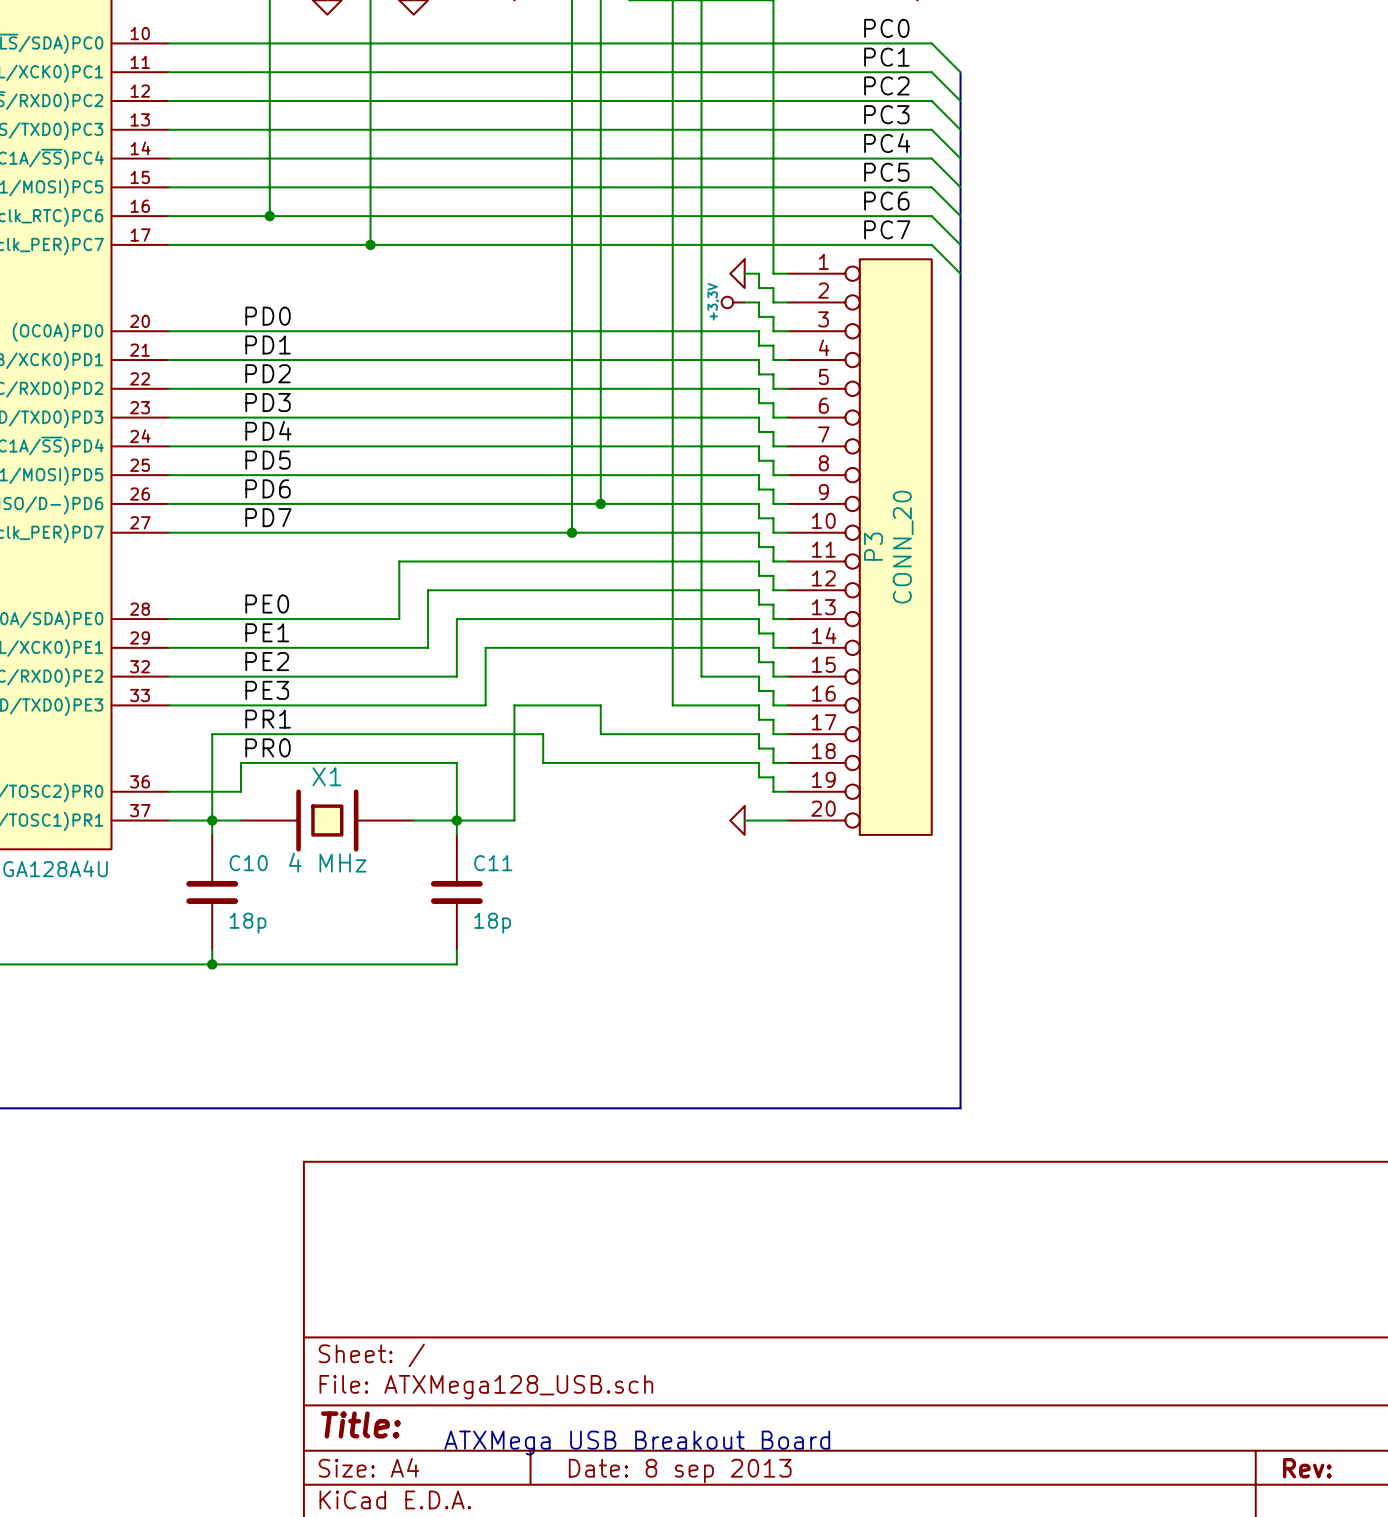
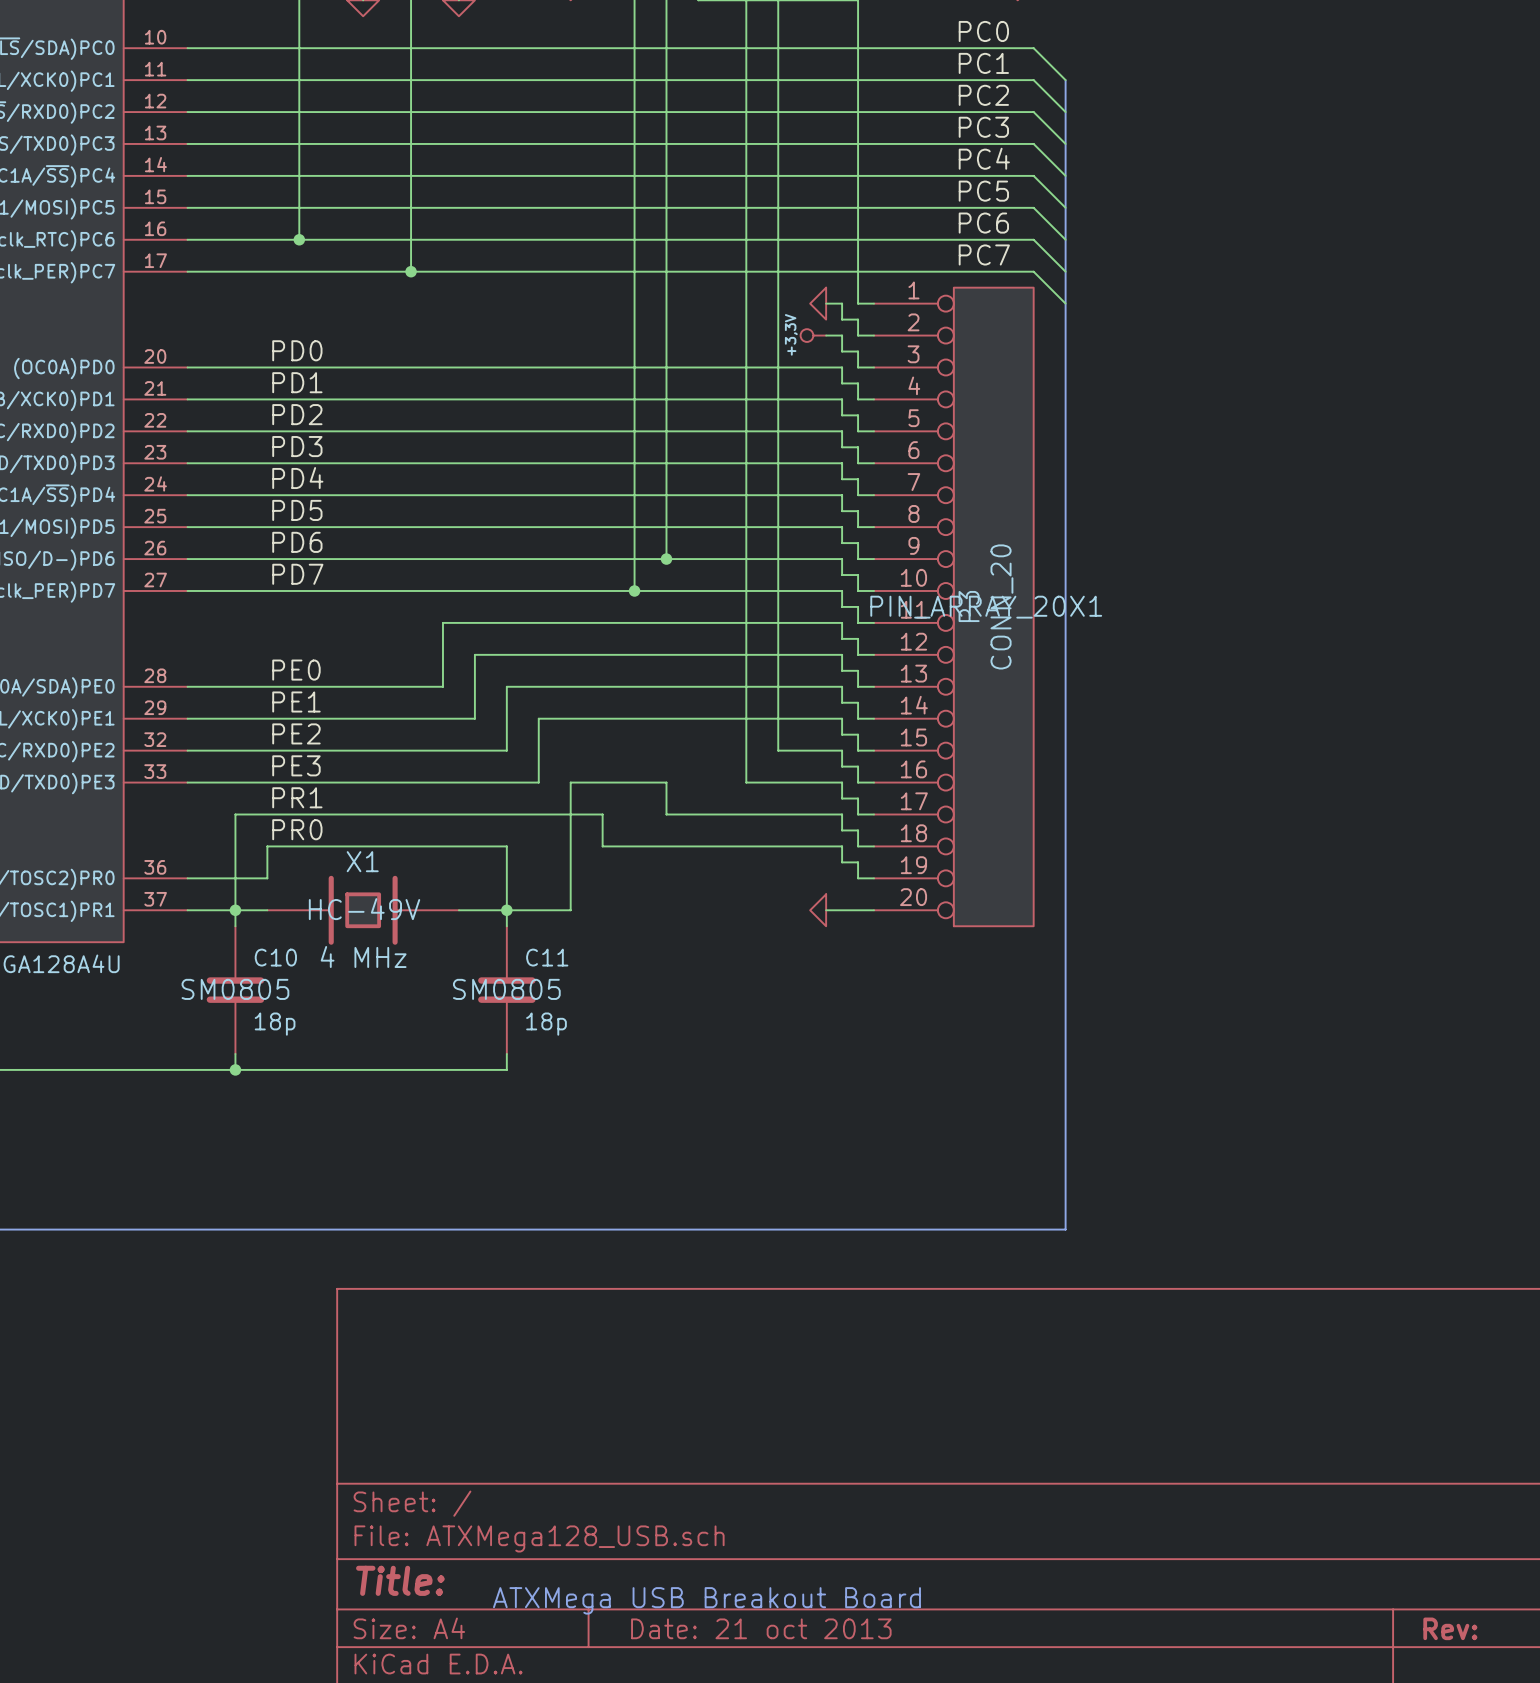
P3 text: none -> PIN_ARRAY_20X1 (986, 607)
X1 text: none -> HC-49V (364, 909)
C10 text: none -> SM0805 (235, 989)
C11 text: none -> SM0805 (506, 989)
title block: Date: 8 sep 2013 (680, 1471) -> Date: 21 oct 2013 (761, 1628)

